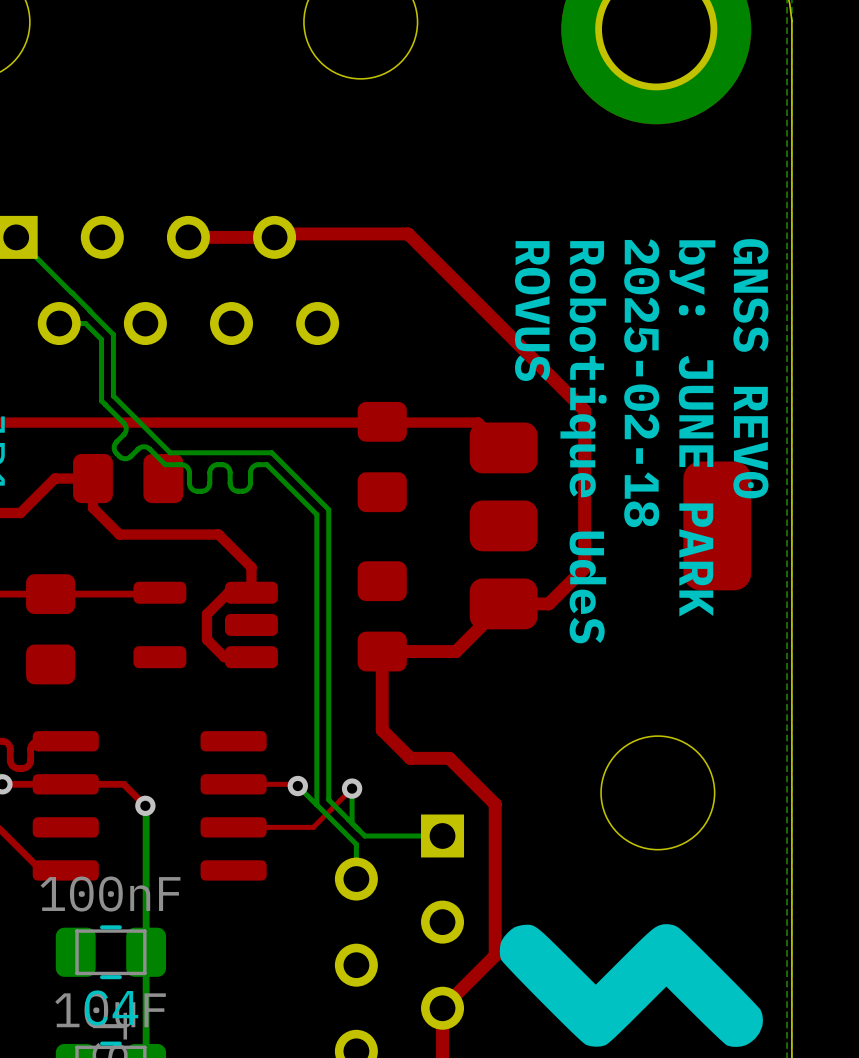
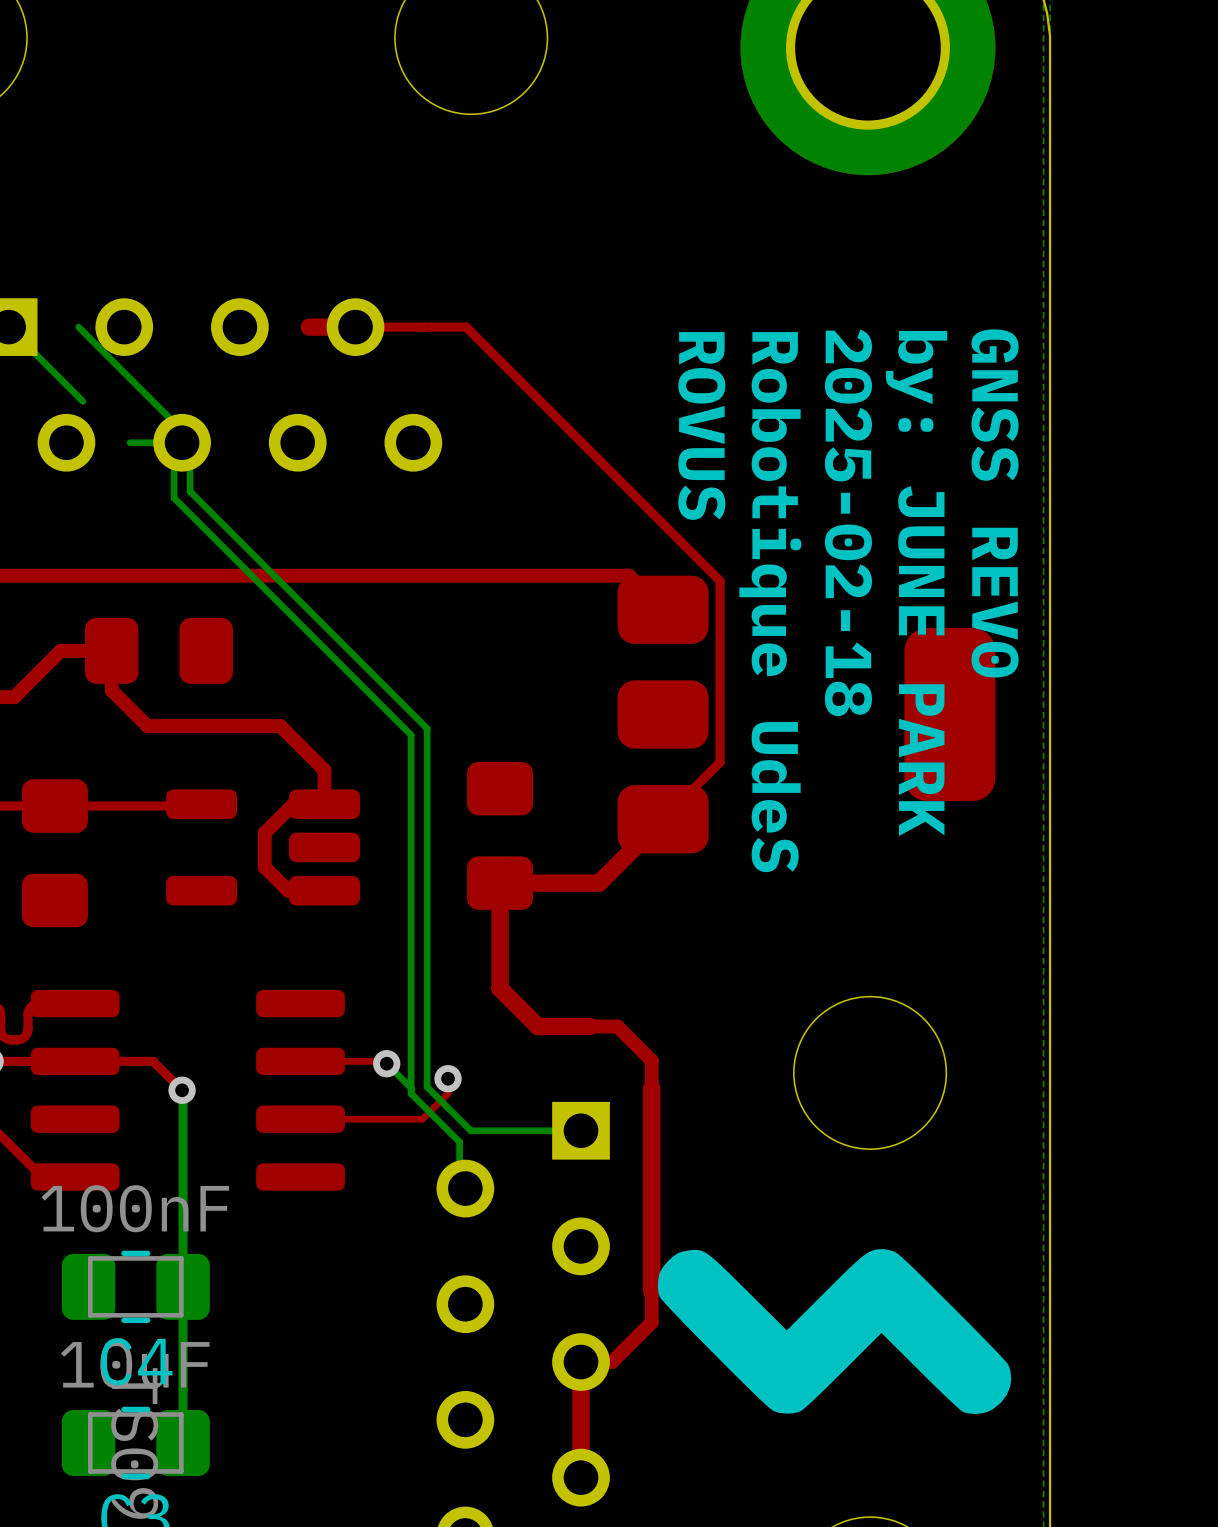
top track: (240, 237) (188, 237) -> none
top track: (274, 237) (278, 233) (408, 233) (584, 410) (584, 568) (548, 603) (503, 603) -> (355, 327) (466, 327) (720, 580) (720, 762) (663, 819)
bottom track: (72, 292) (90, 310) -> none
bottom track: (90, 311) (113, 334) (113, 395) (170, 452) (271, 452) (328, 509) (328, 799) (364, 835) -> (78, 327) (190, 438) (190, 491) (427, 728) (427, 1086) (470, 1130) (476, 1130)
bottom track: (59, 323) (85, 323) (101, 339) (101, 400) (123, 423) (126, 428) (124, 433) (114, 445) (114, 451) (120, 457) (128, 458) (139, 447) (147, 447) (165, 464) (186, 466) (189, 471) (190, 486) (197, 491) (204, 490) (208, 487) (210, 470) (215, 465) (222, 464) (227, 467) (231, 487) (235, 490) (242, 491) (249, 486) (250, 471) (252, 467) (266, 464) (316, 514) (316, 804) (356, 844) (356, 879) -> none
bottom track: none -> (130, 442) (165, 442) (174, 451) (174, 498) (411, 735) (411, 1093) (459, 1142) (459, 1188)
part: (382, 457) -> none
top track: (449, 758) (495, 804) -> (590, 1026) (617, 1026) (651, 1060) (651, 1088)
top track: (352, 788) (313, 827) -> (448, 1078) (448, 1093) (422, 1119) (407, 1119)
bottom track: (352, 788) (352, 823) -> none
via position: (352, 788) -> (448, 1078)
top track: (495, 955) (442, 1008) -> (651, 1291) (651, 1322) (612, 1362) (581, 1362)

